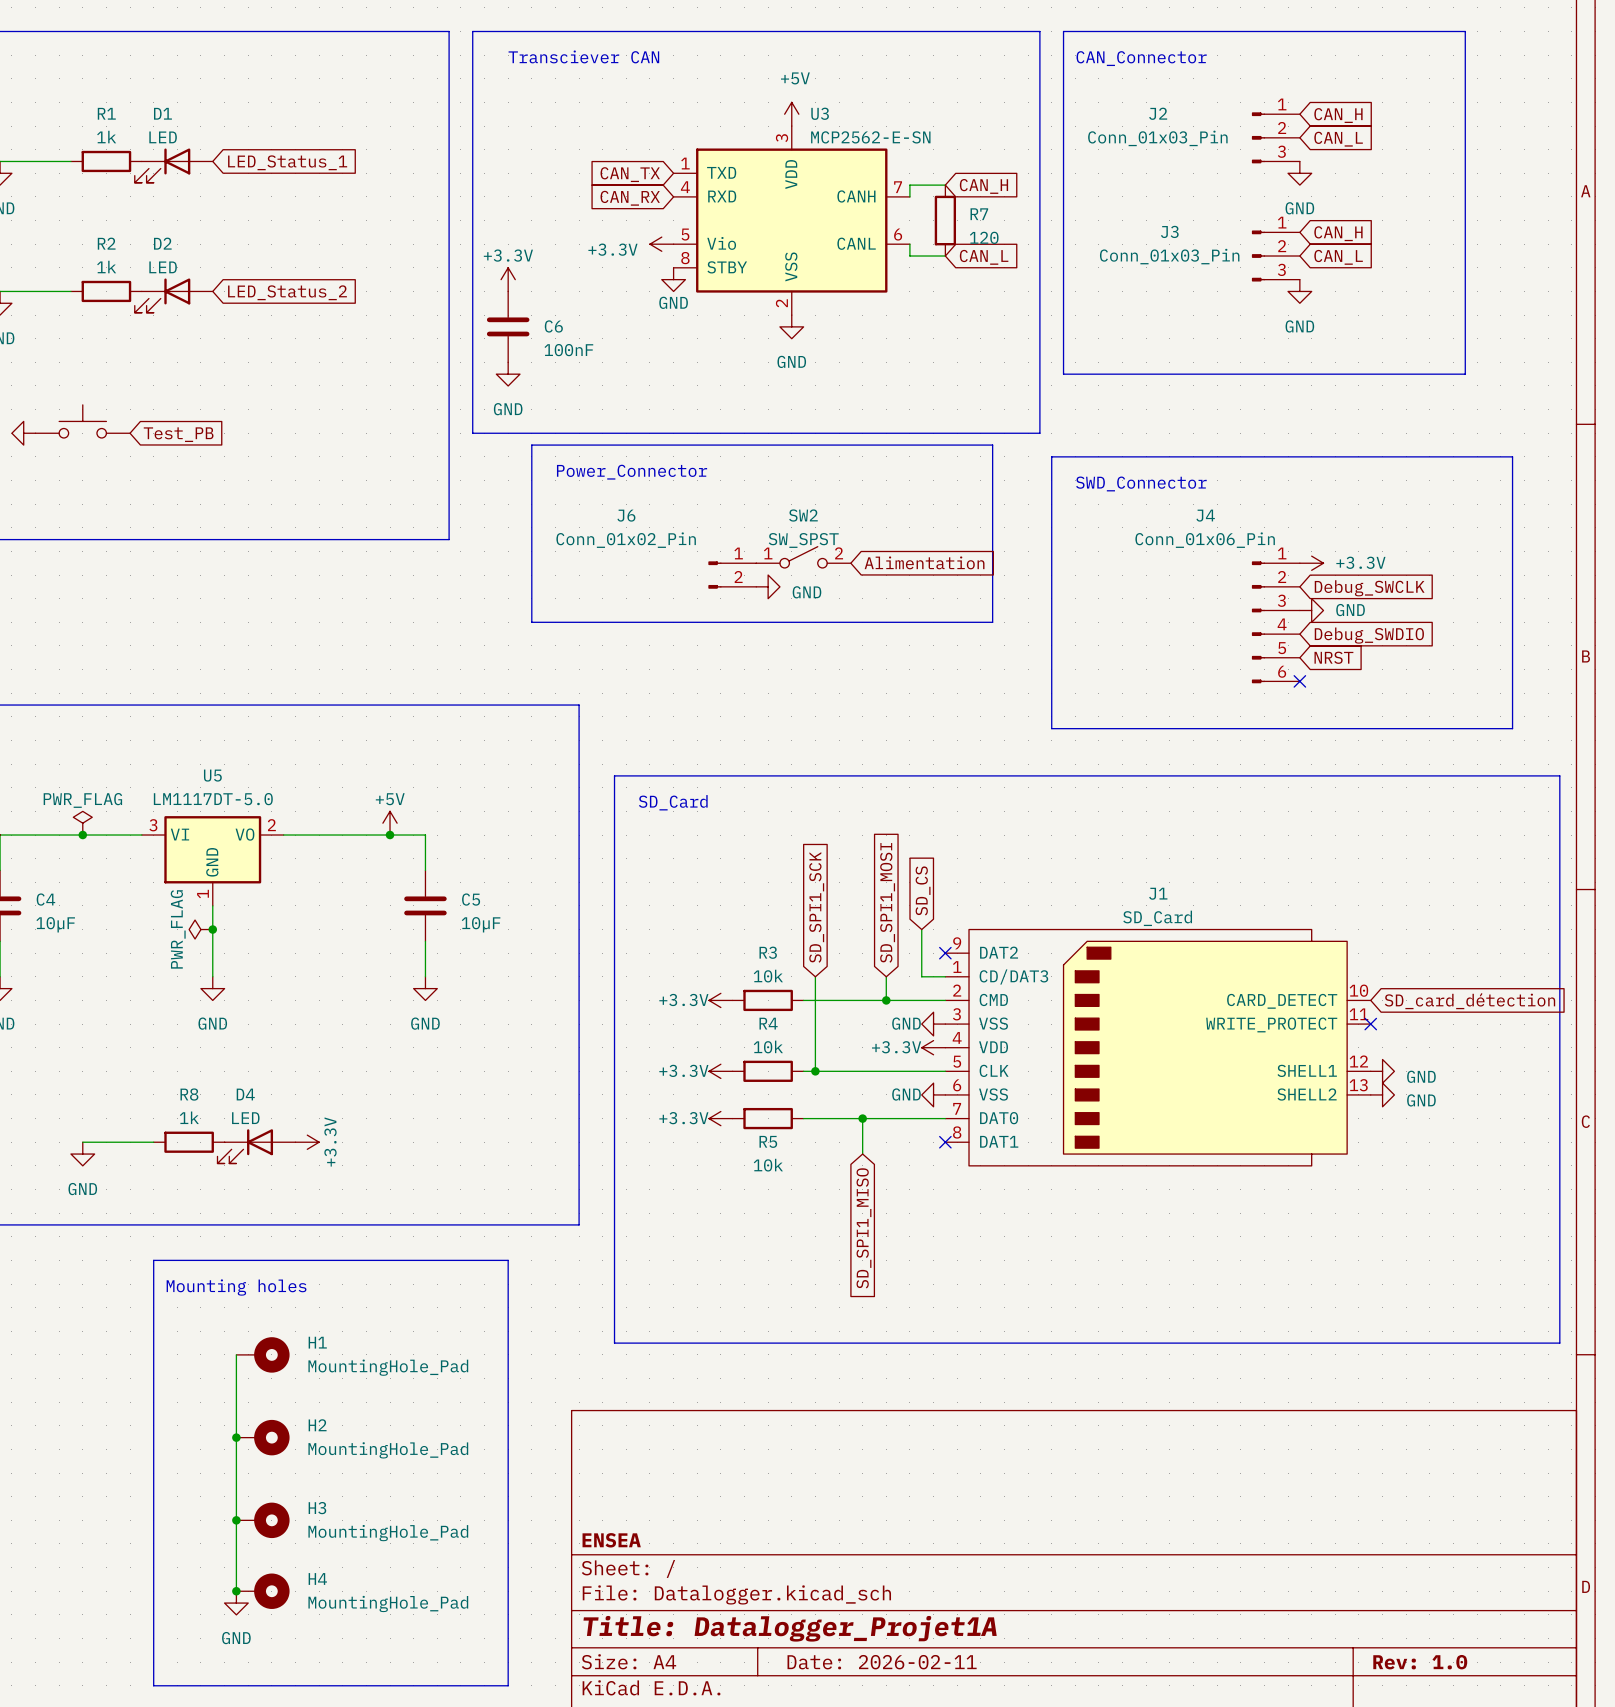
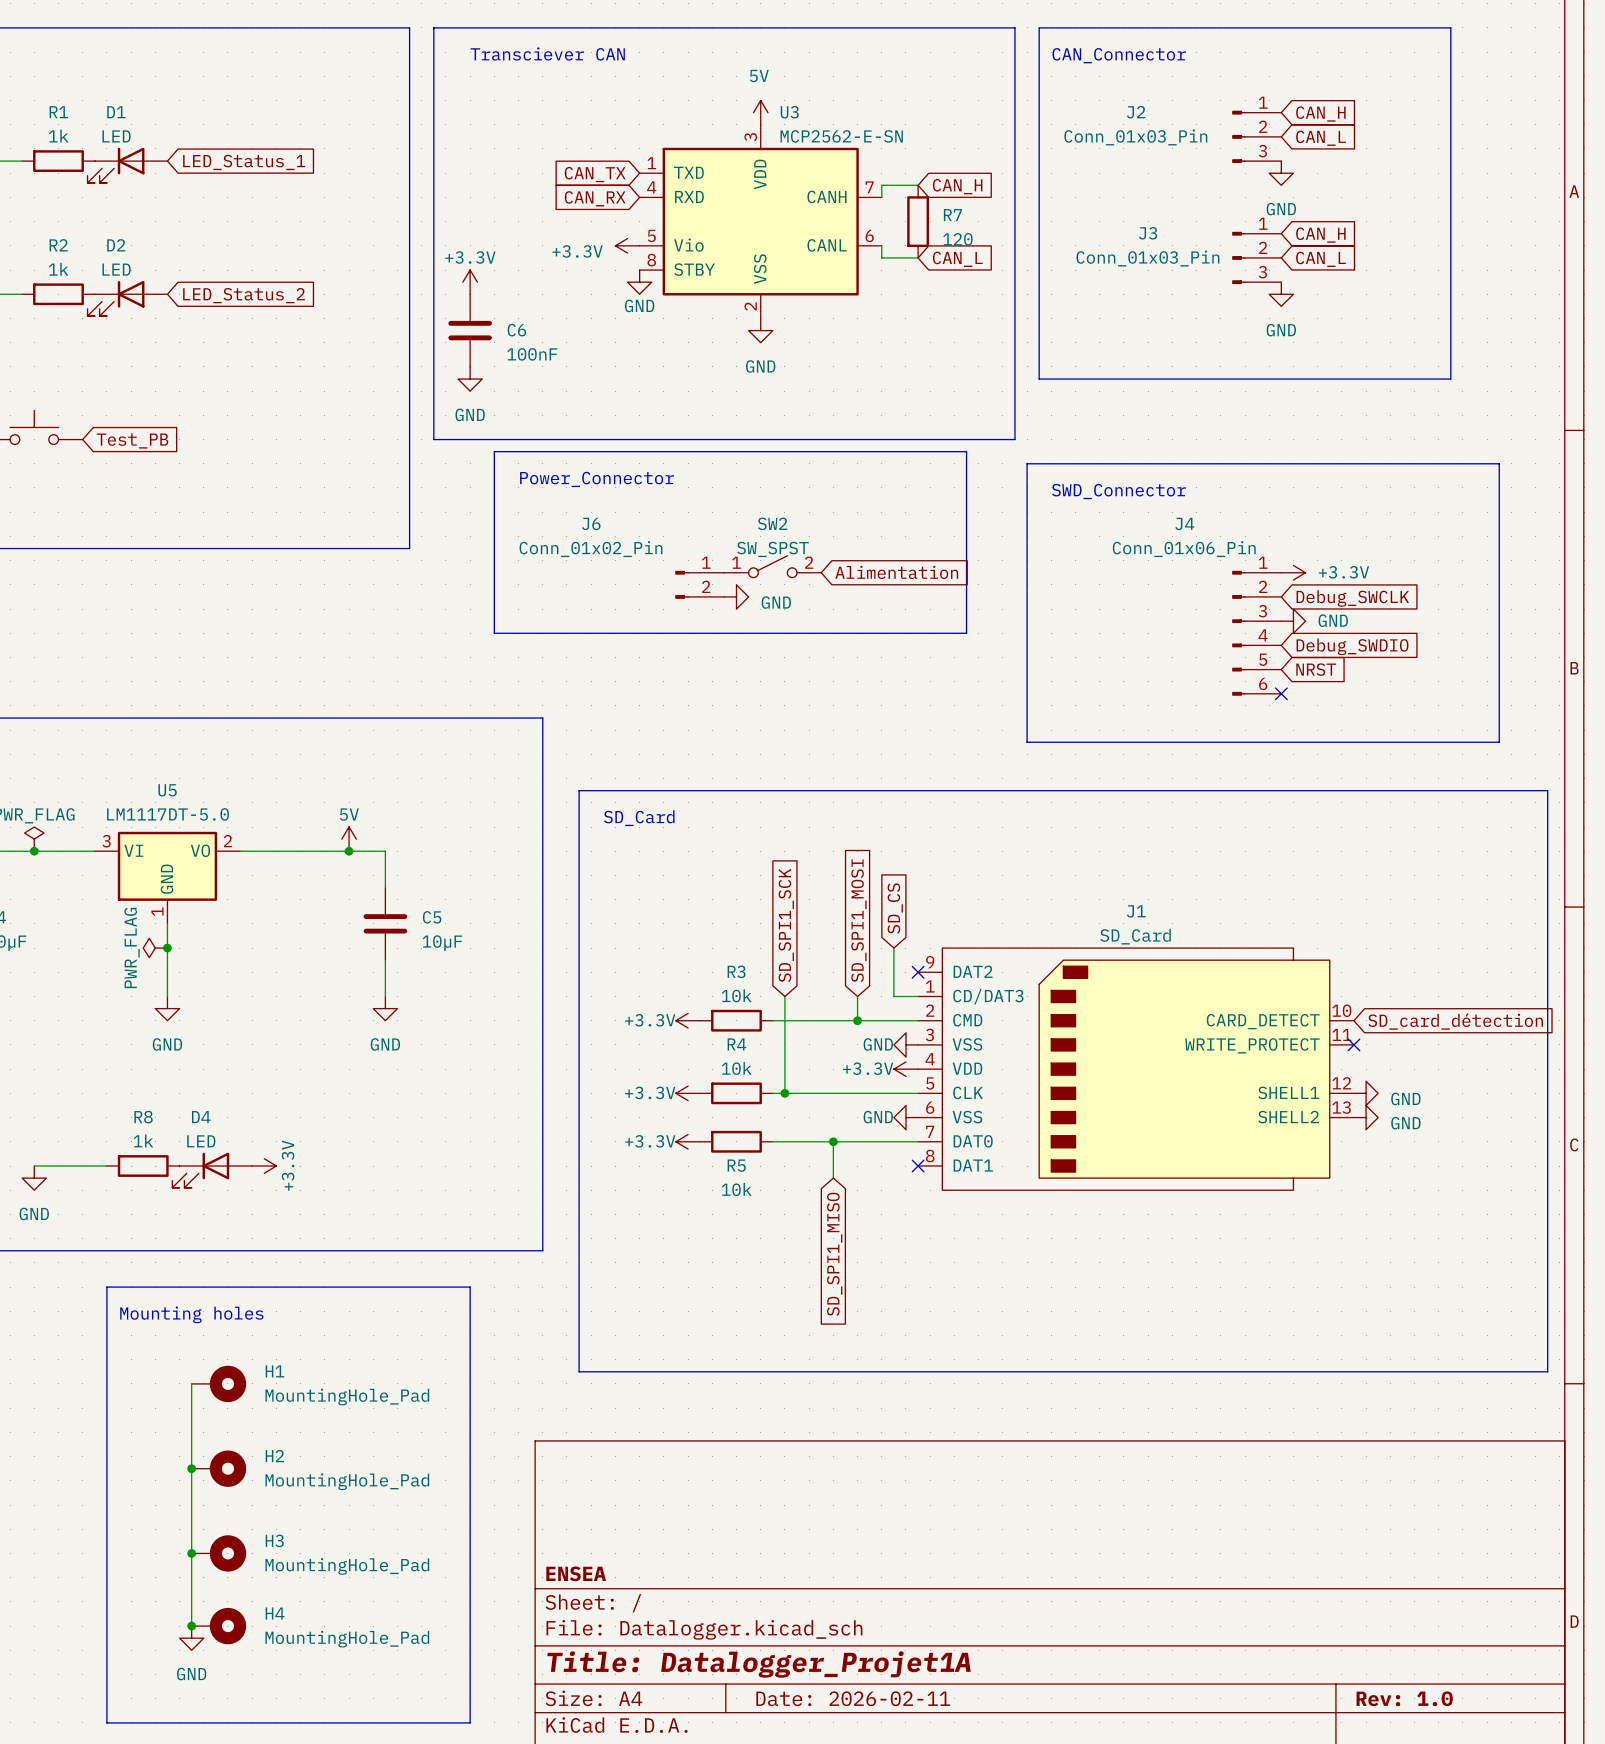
power symbol: +5V (791, 114) -> 5V (760, 112)
power symbol: +5V (390, 823) -> 5V (349, 839)

